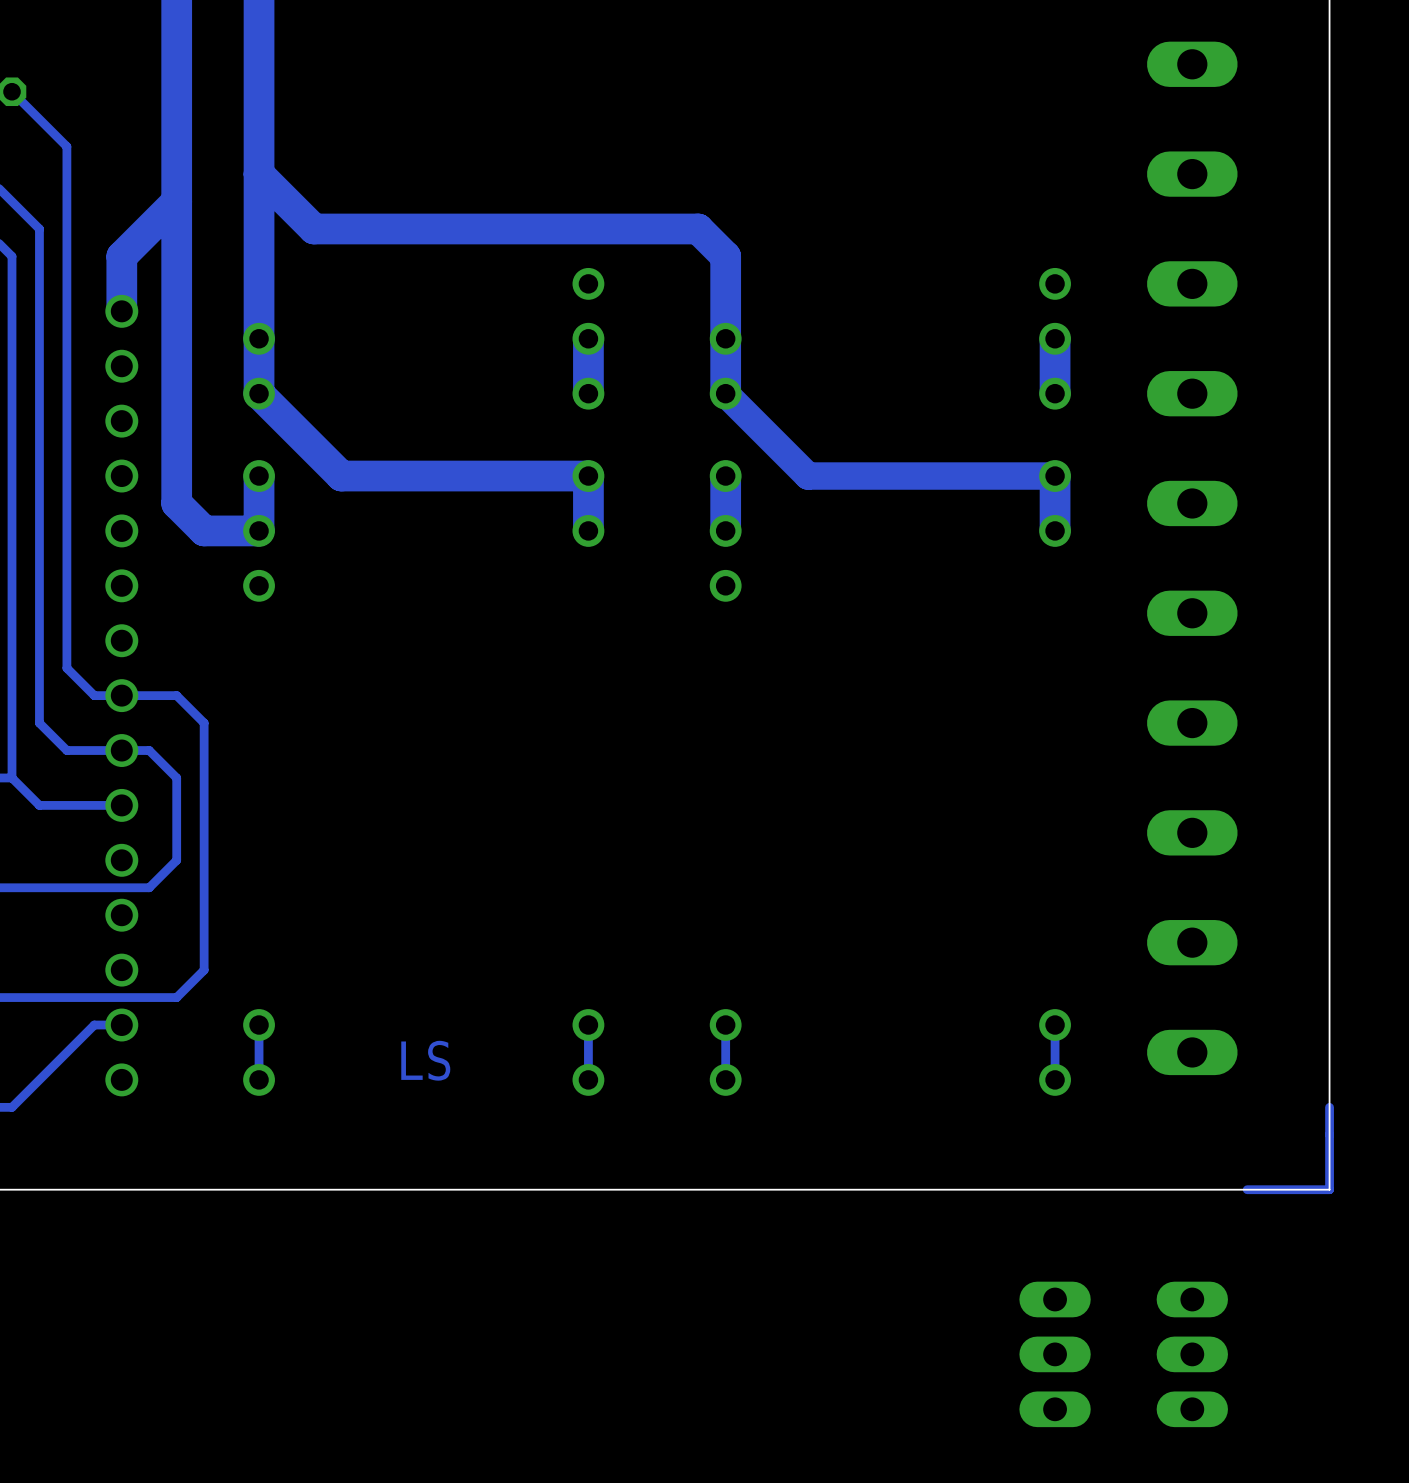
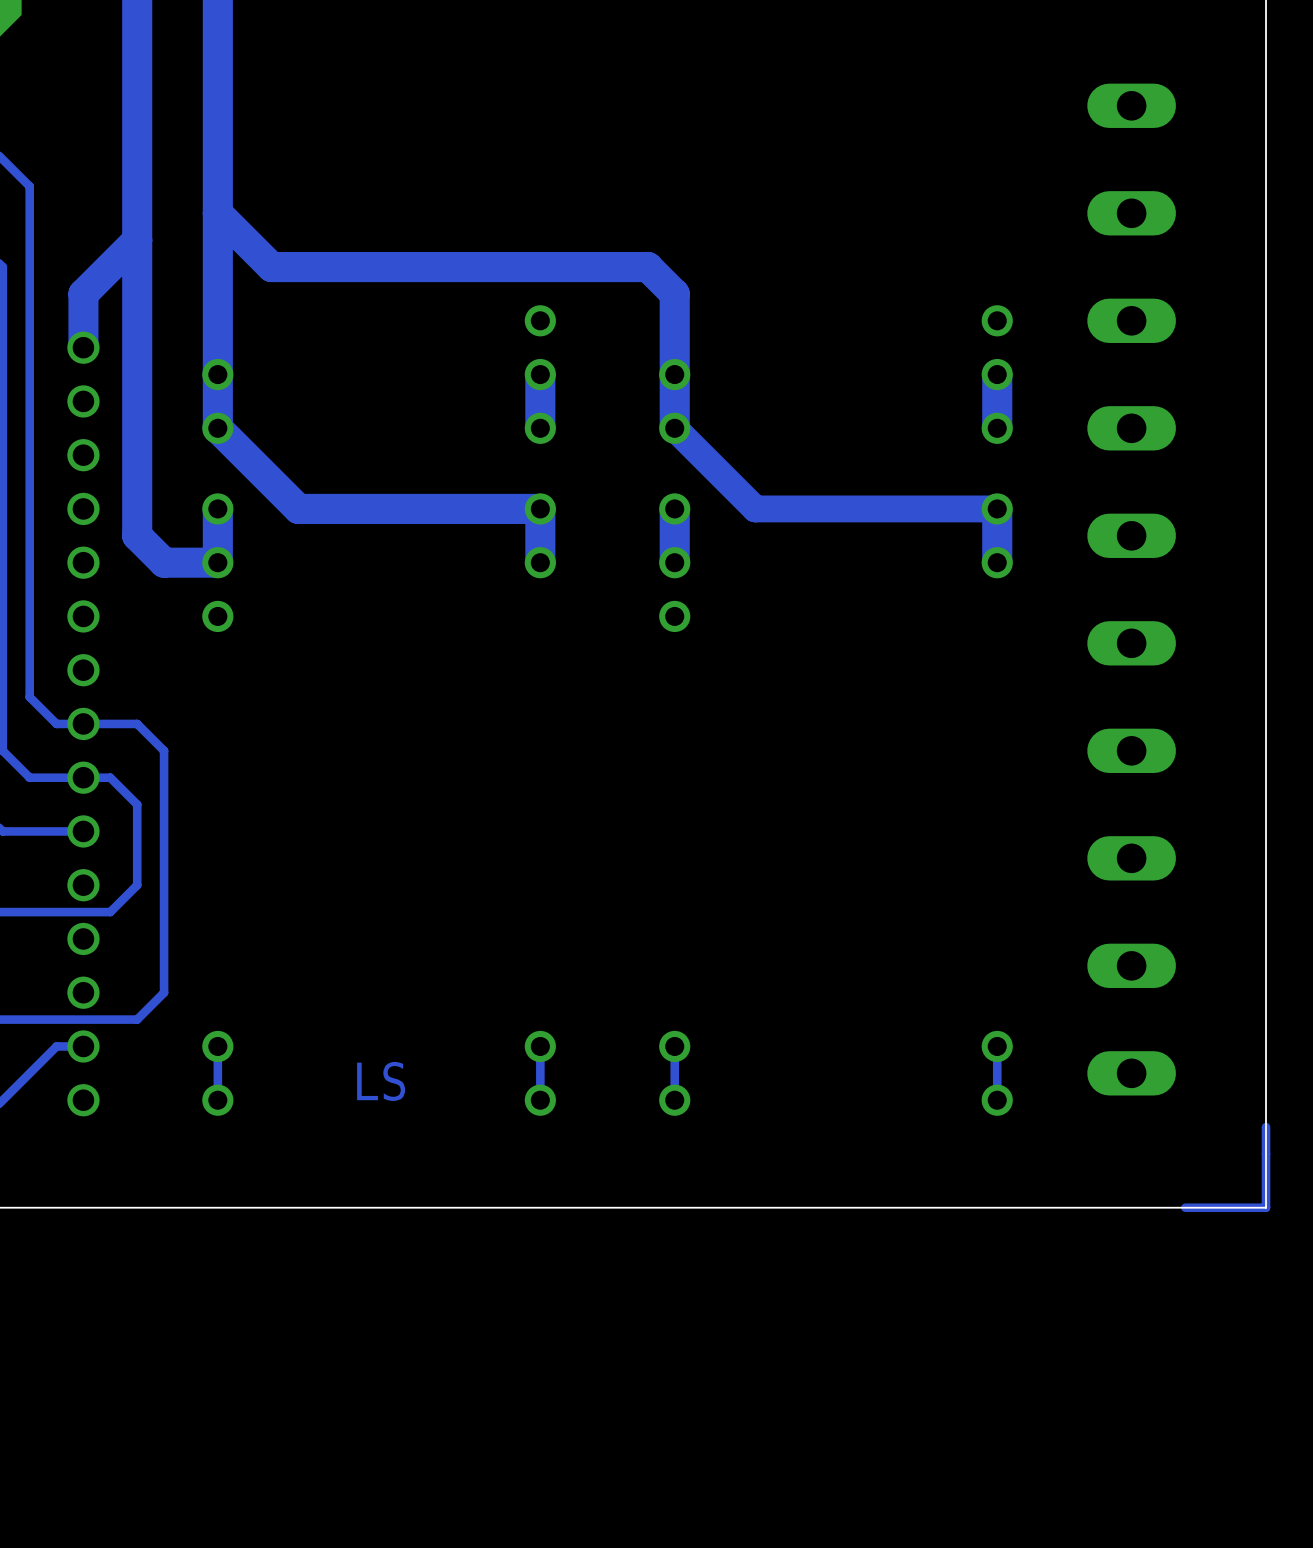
part: (1055, 1354) -> none
part: (1192, 1354) -> none

